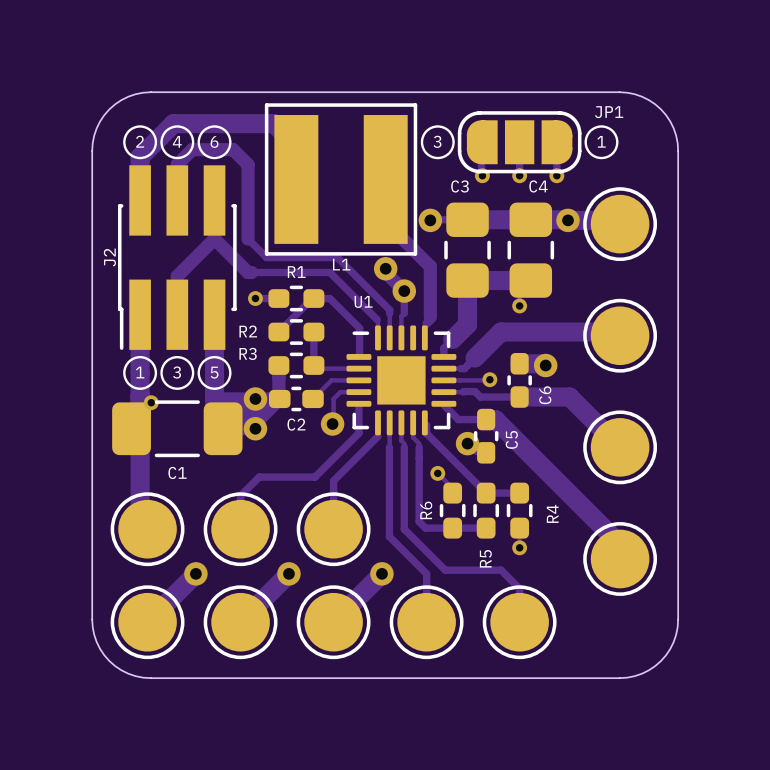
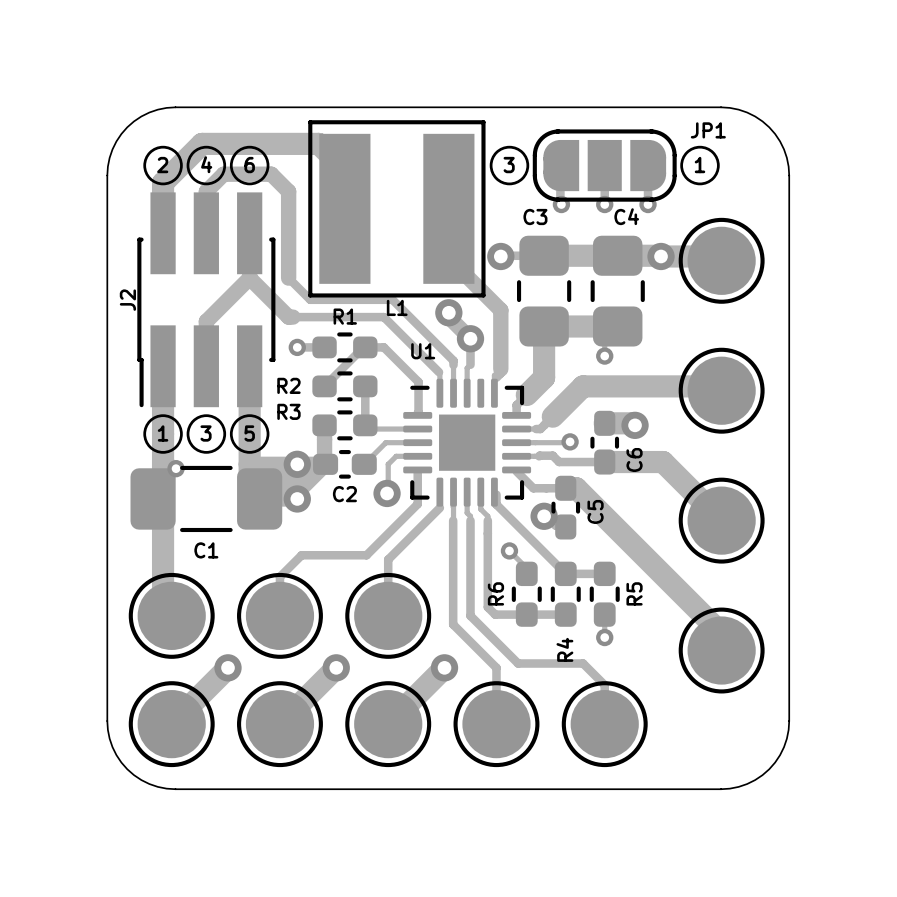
R4 name position: R4 (552, 513) -> R4 (564, 649)
R5 name position: R5 (485, 558) -> R5 (634, 593)

